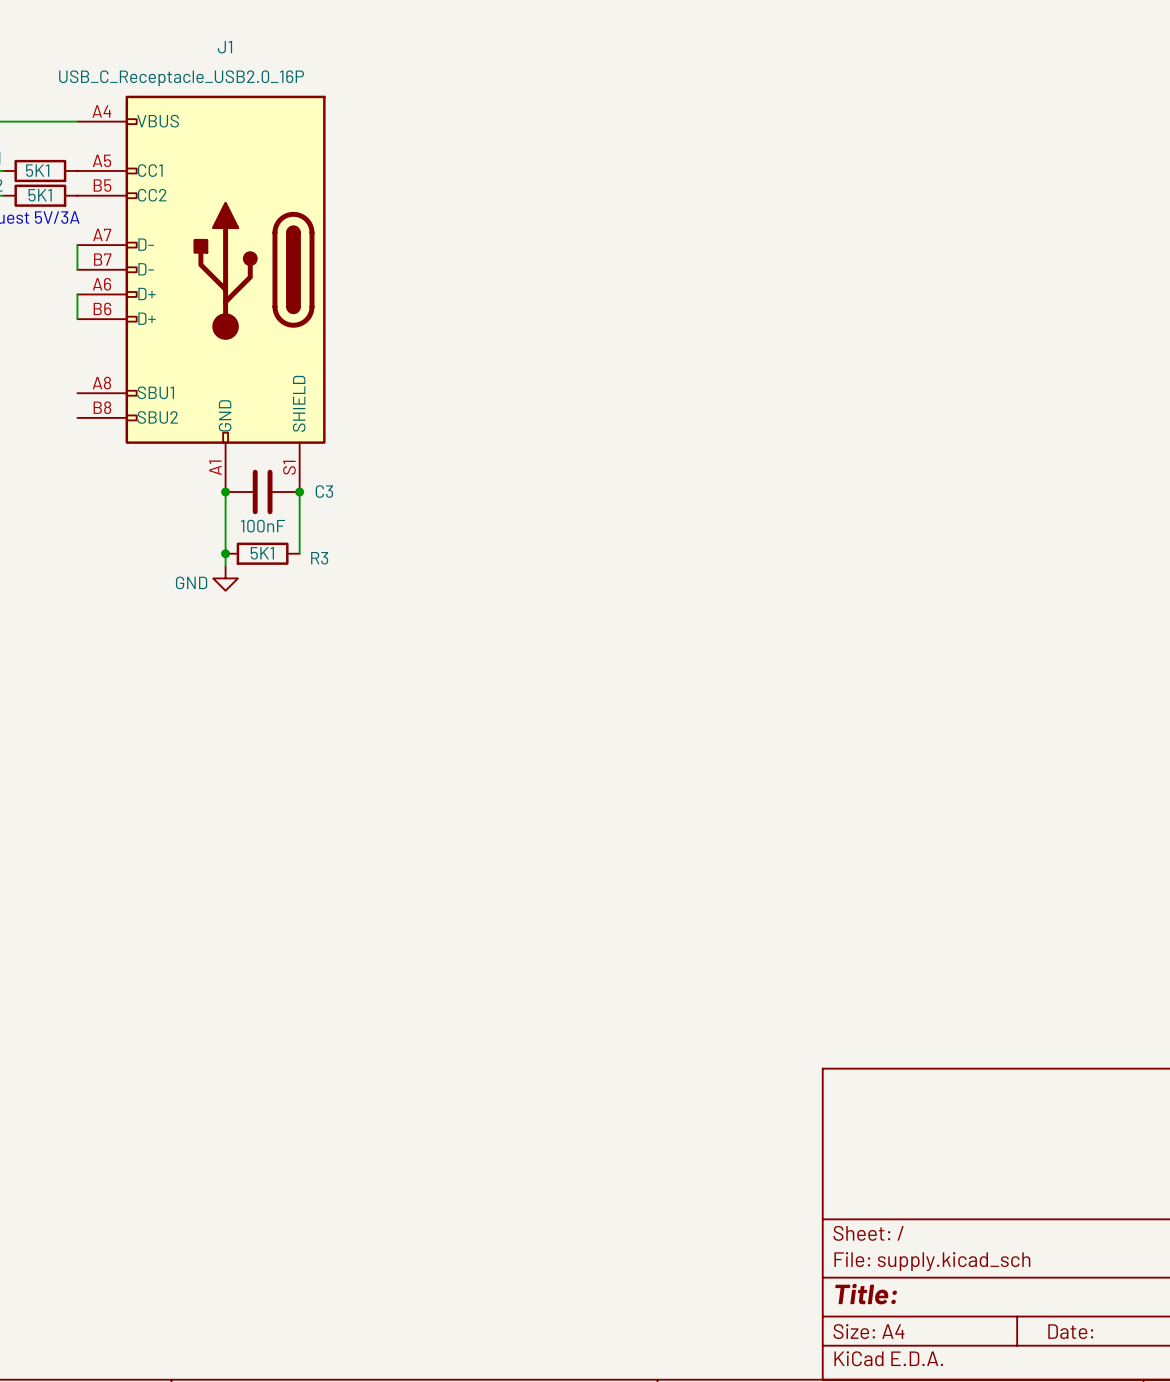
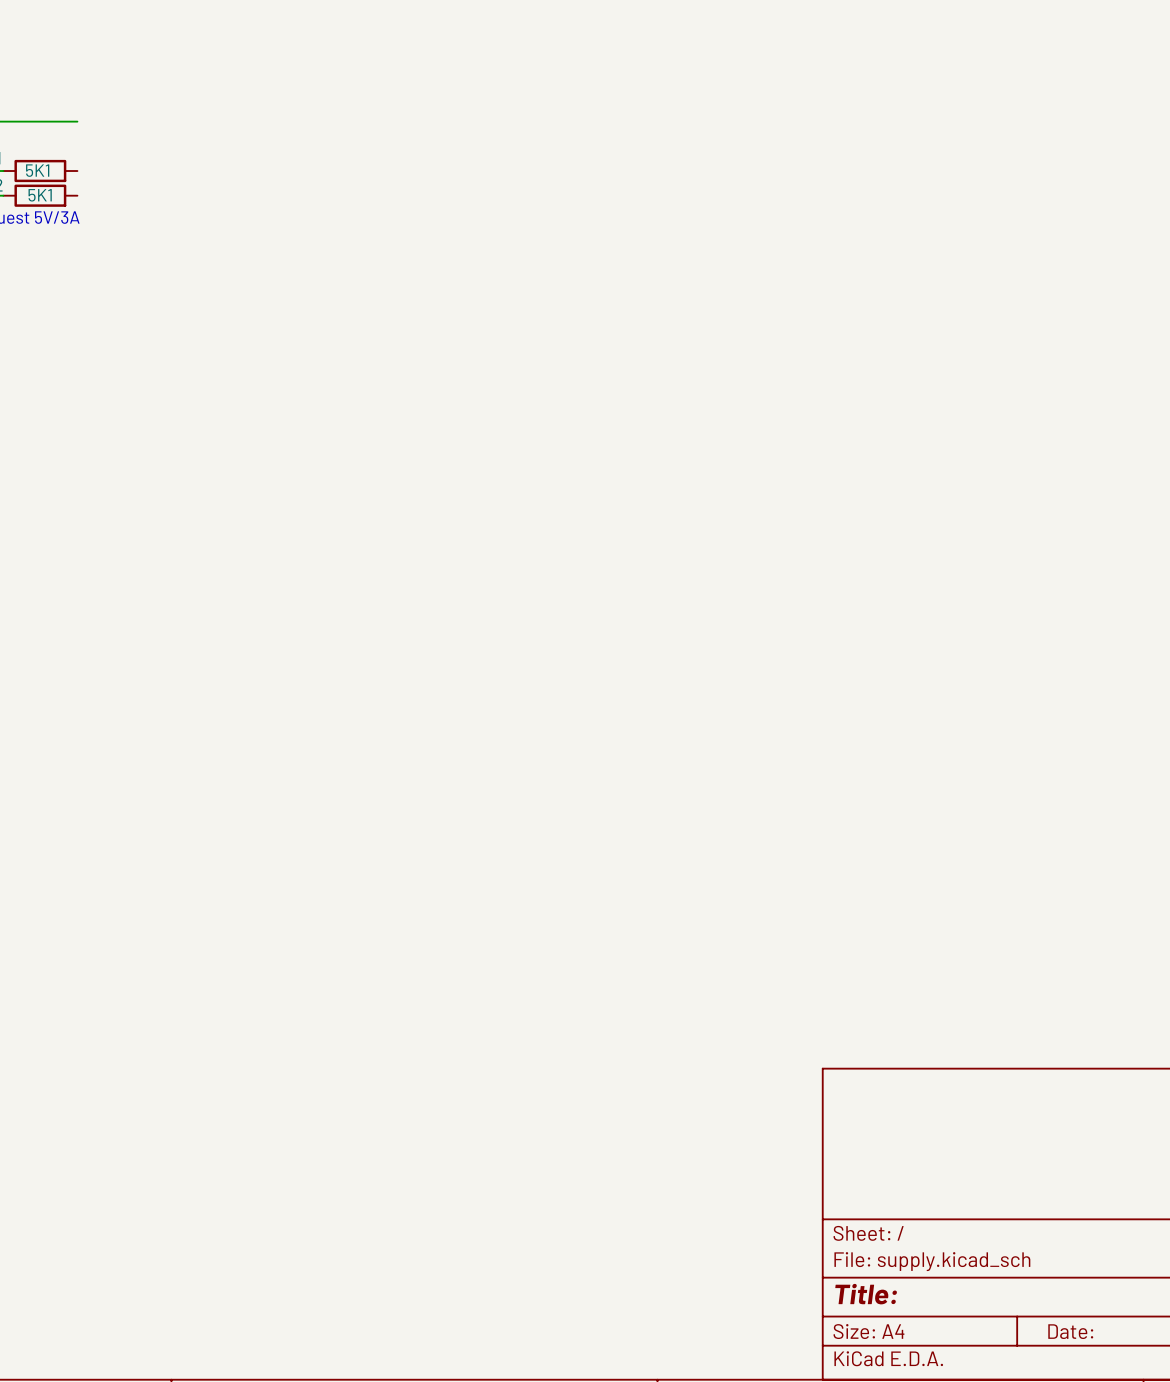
wire: (77, 245) (77, 269) -> none
J1: USB_C_Receptacle_USB2.0_16P (201, 293) -> none
wire: (77, 294) (77, 319) -> none
wire: (225, 492) (225, 566) -> none
junction: (225, 492) -> none
C3: 100nF (262, 492) -> none
wire: (299, 492) (299, 553) -> none
junction: (299, 492) -> none
junction: (225, 553) -> none
R3: 5K1 (262, 553) -> none
power symbol: GND (225, 578) -> none

